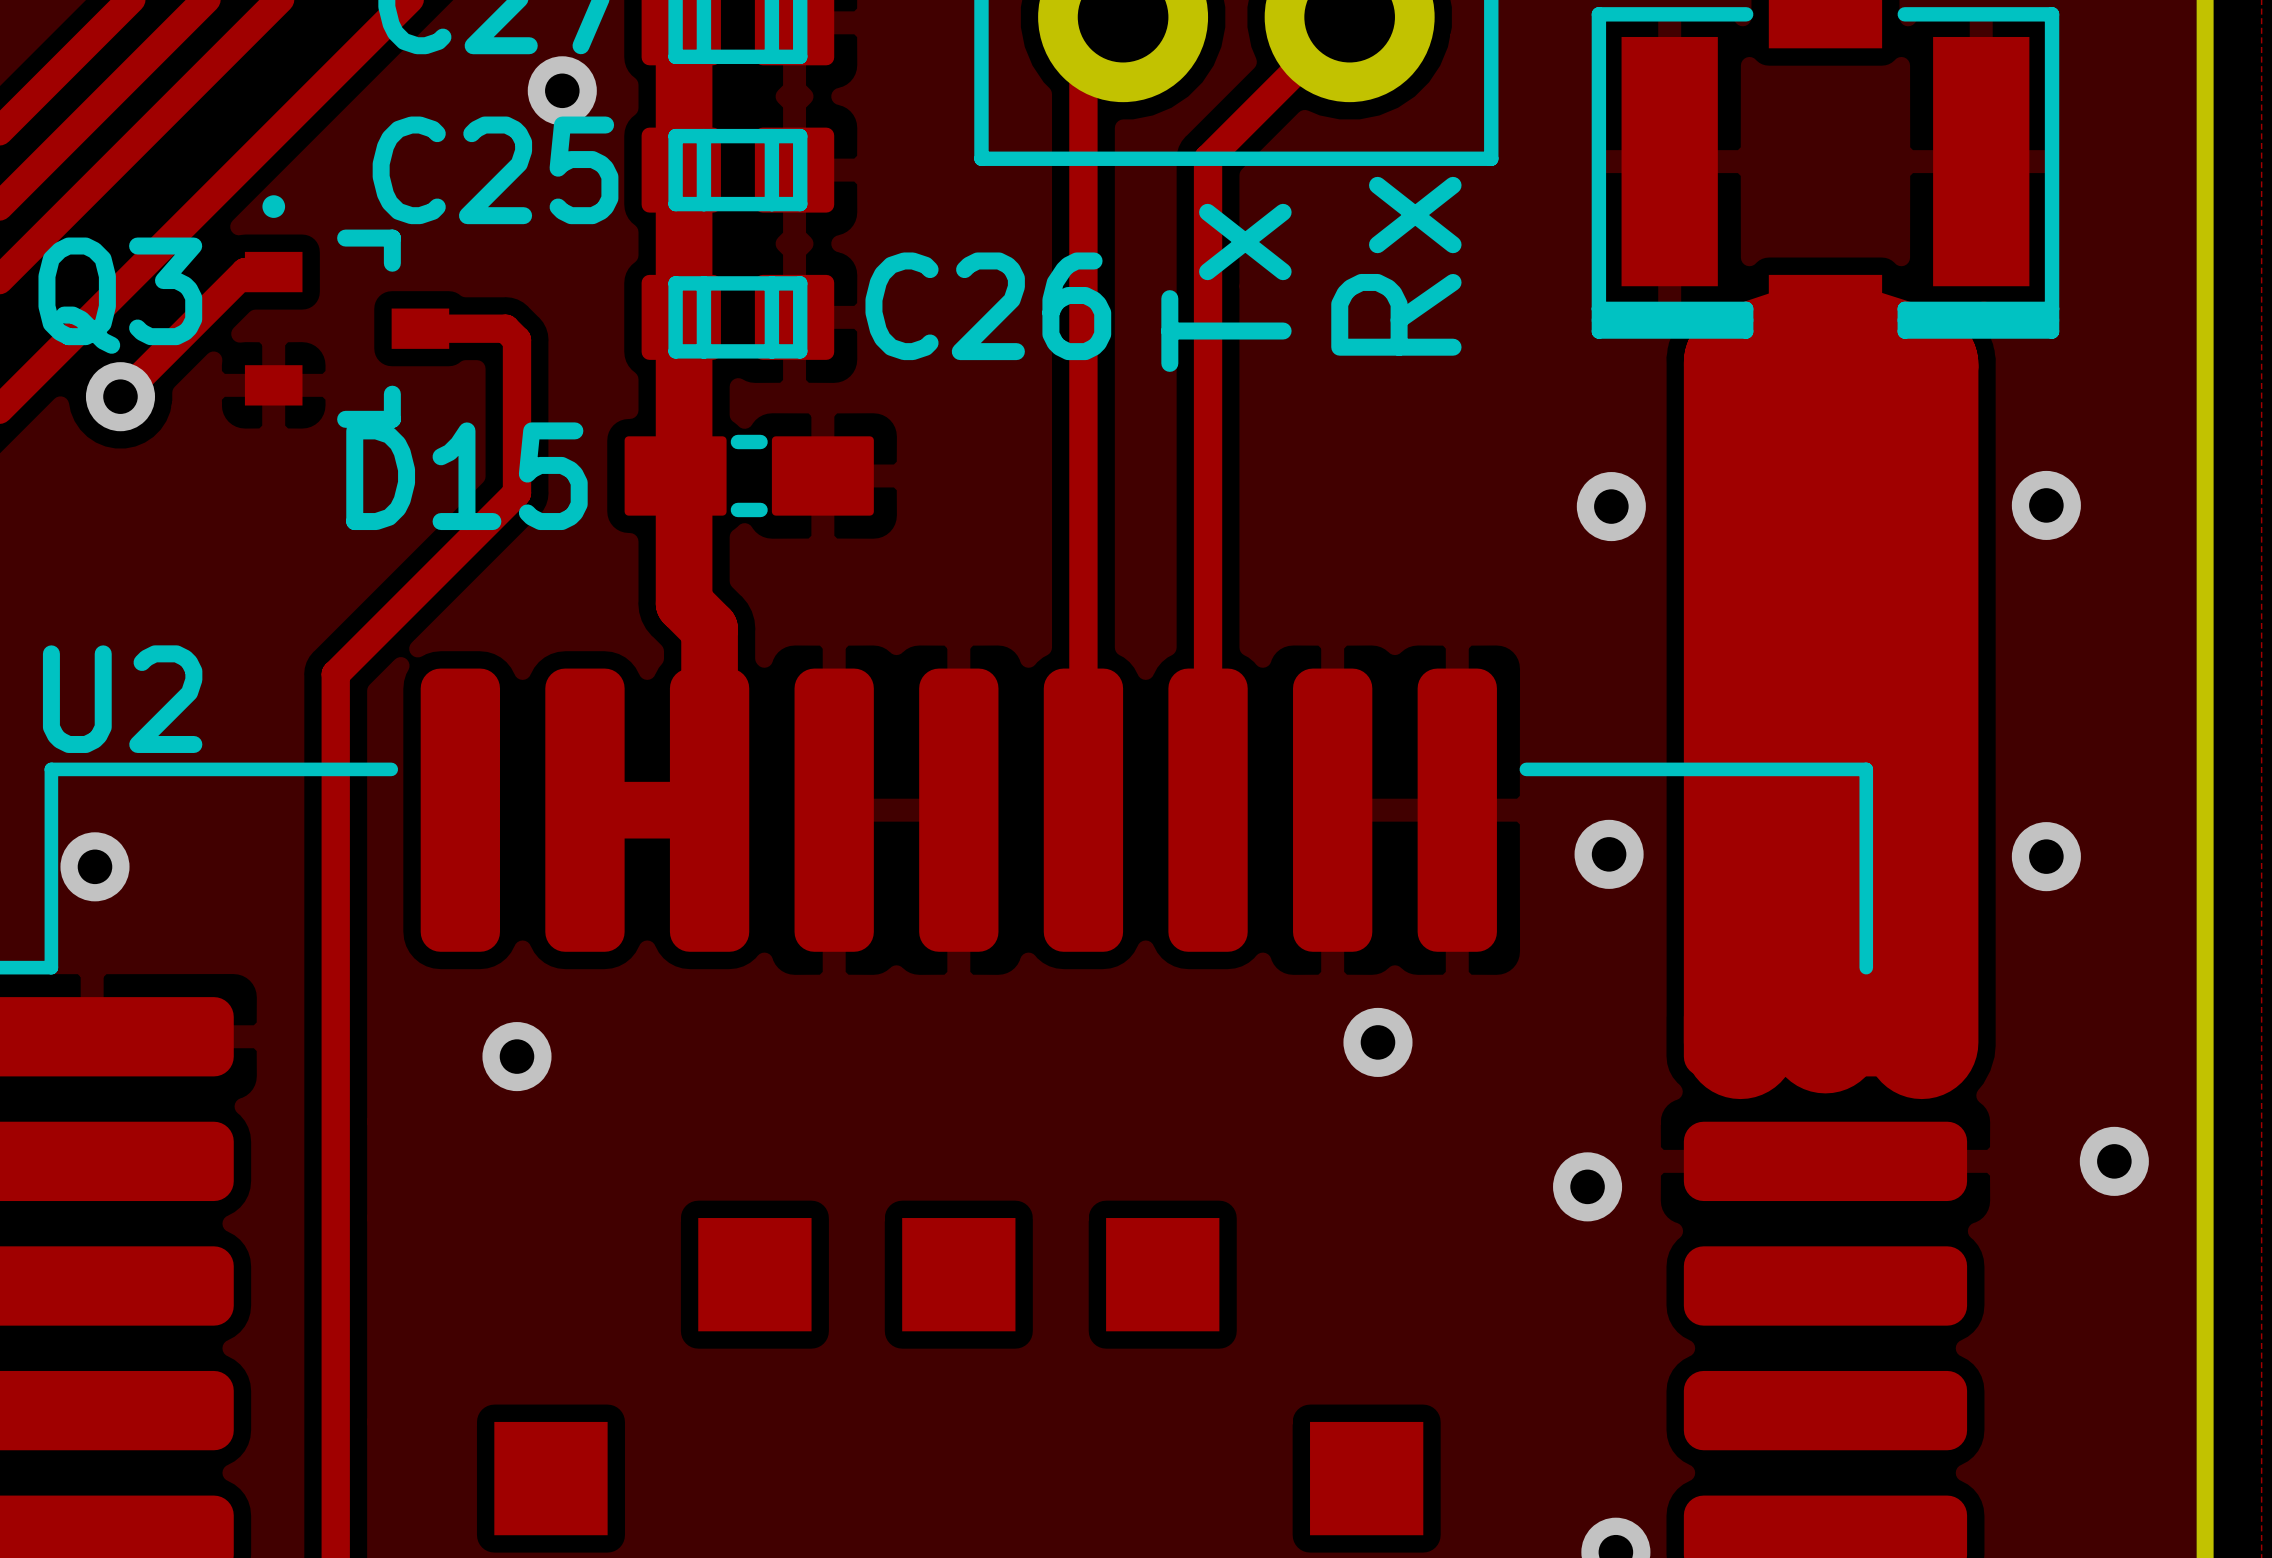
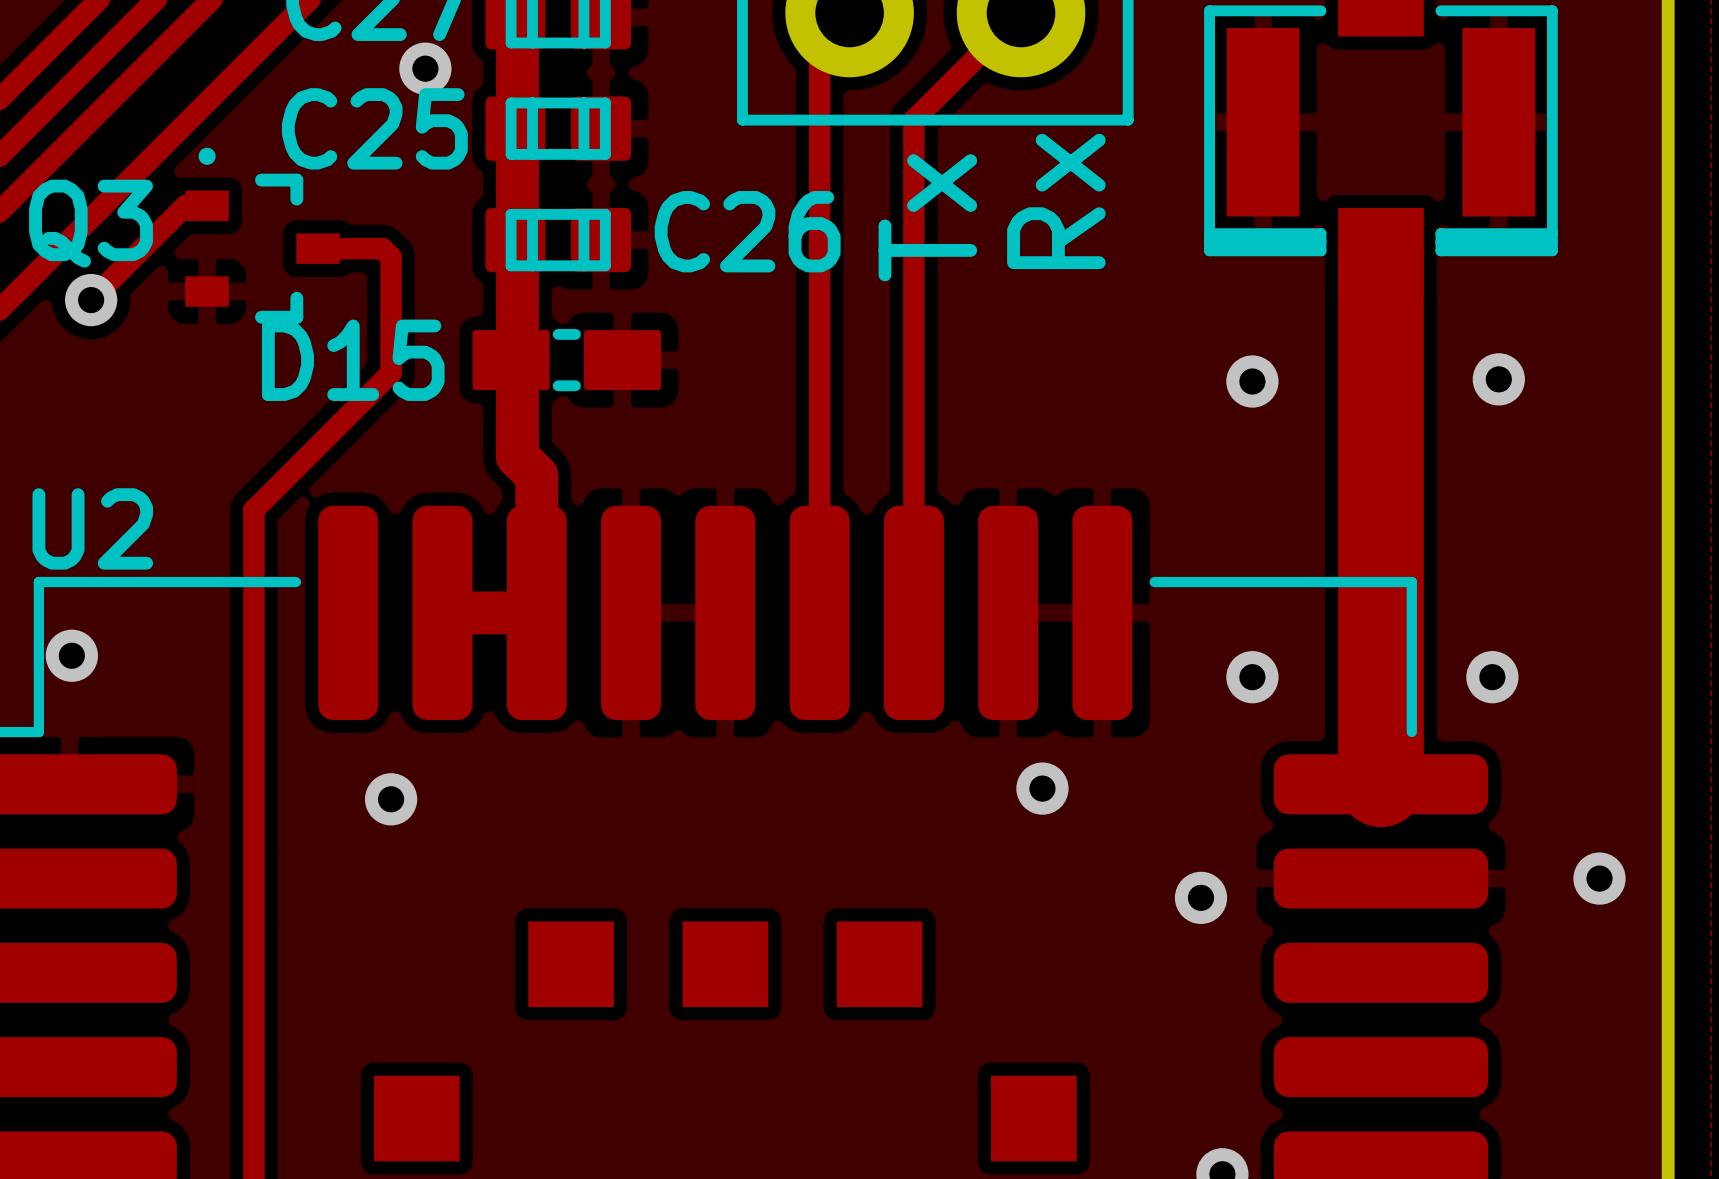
via position: (2046, 505) -> (1498, 379)
via position: (1611, 506) -> (1252, 381)
via position: (1609, 854) -> (1252, 677)
via position: (2046, 856) -> (1492, 677)
track: (1740, 1042) (1740, 362) (1825, 334) (1921, 364) (1921, 1042) -> none

